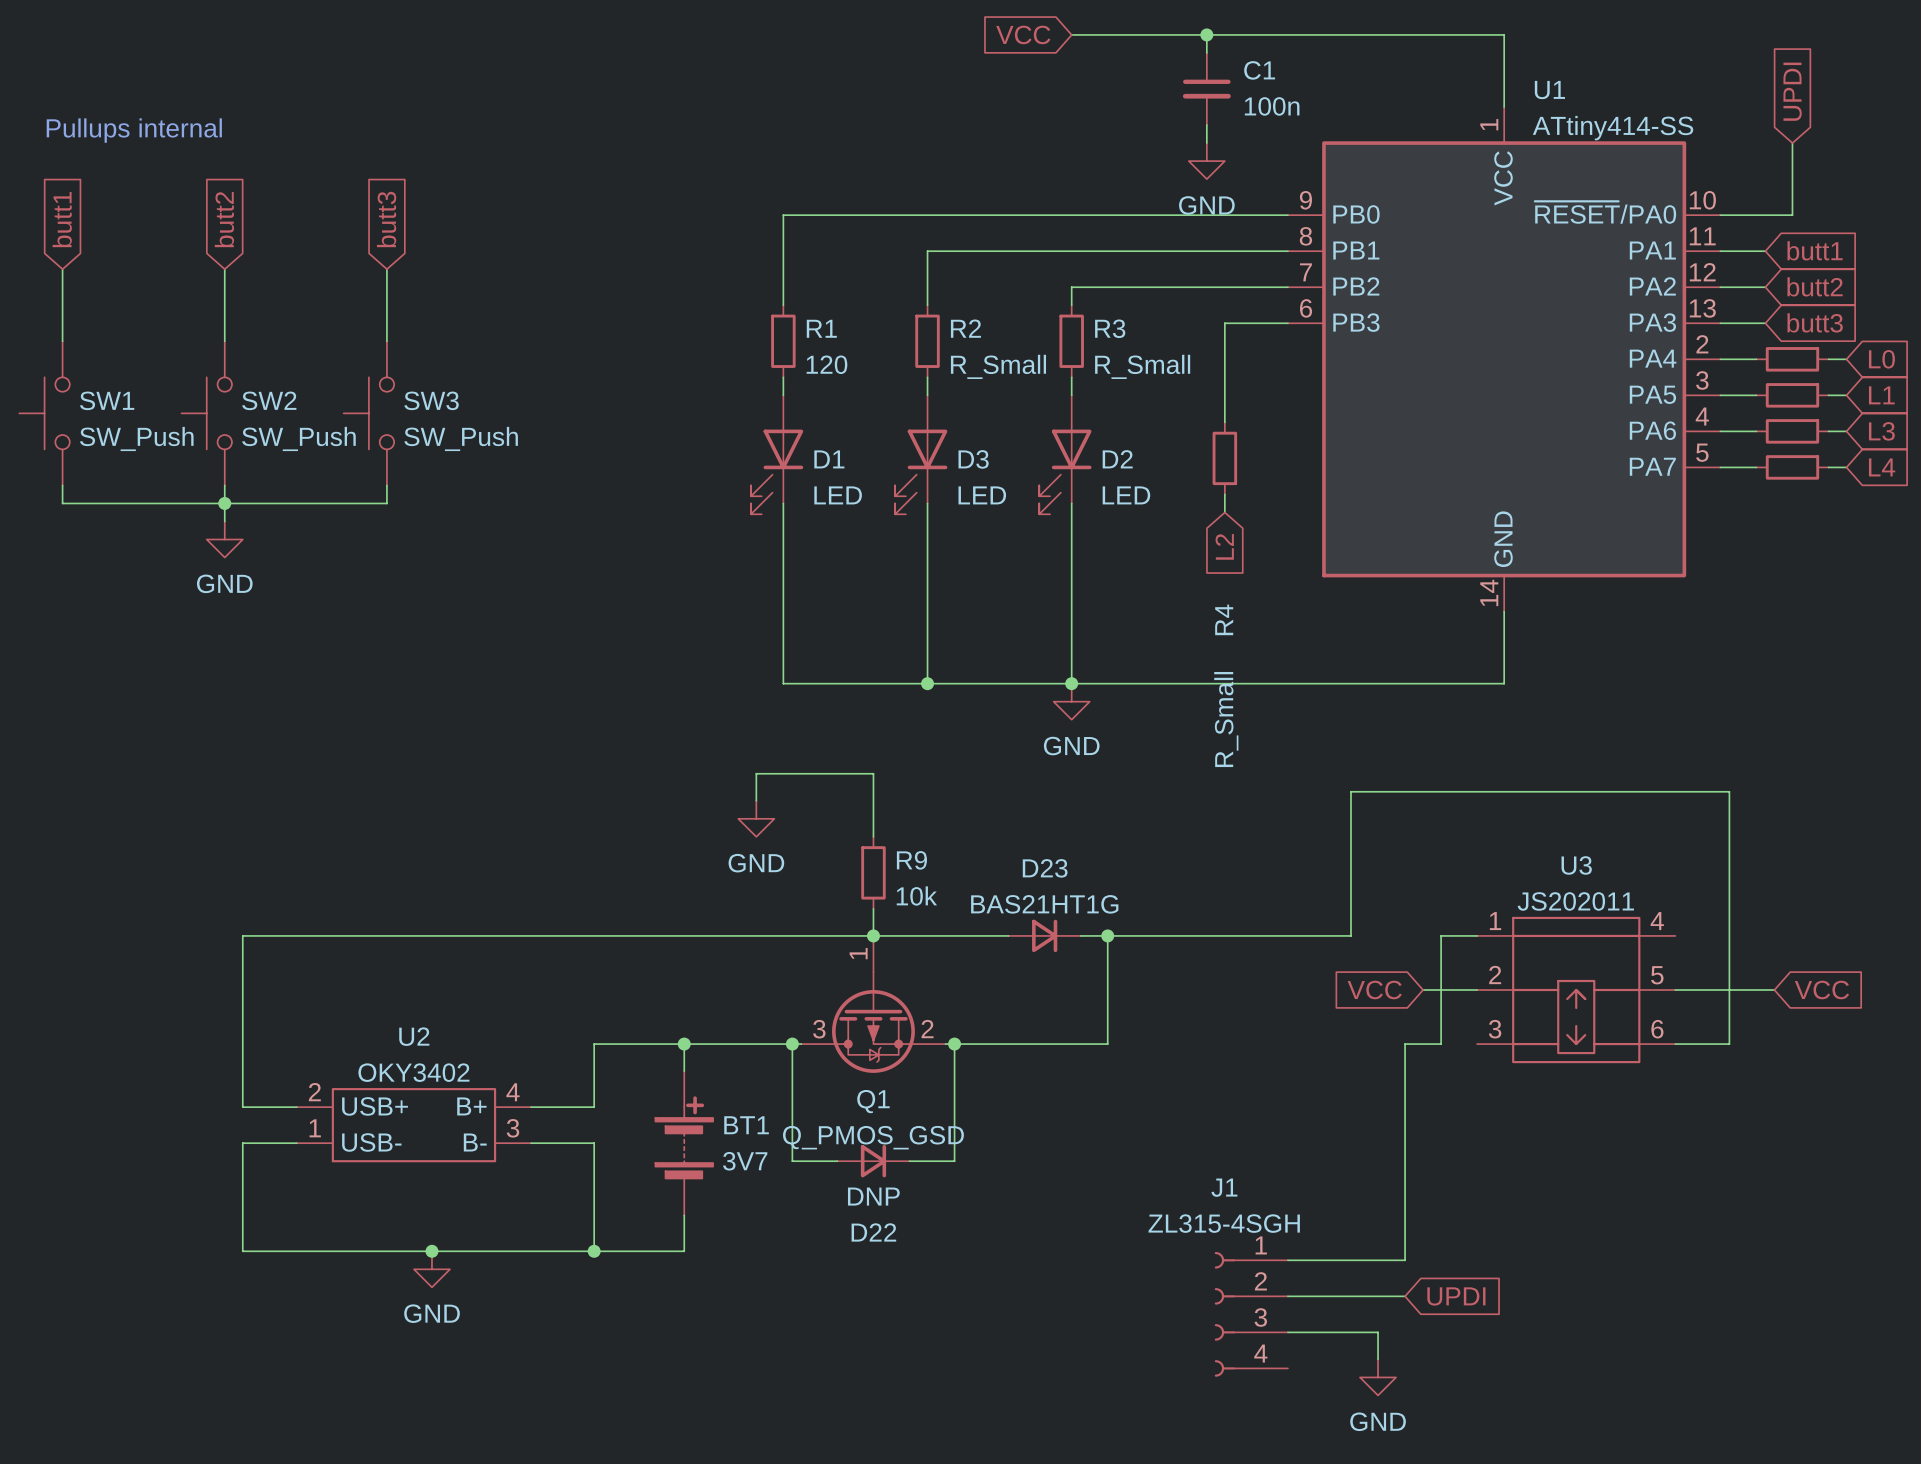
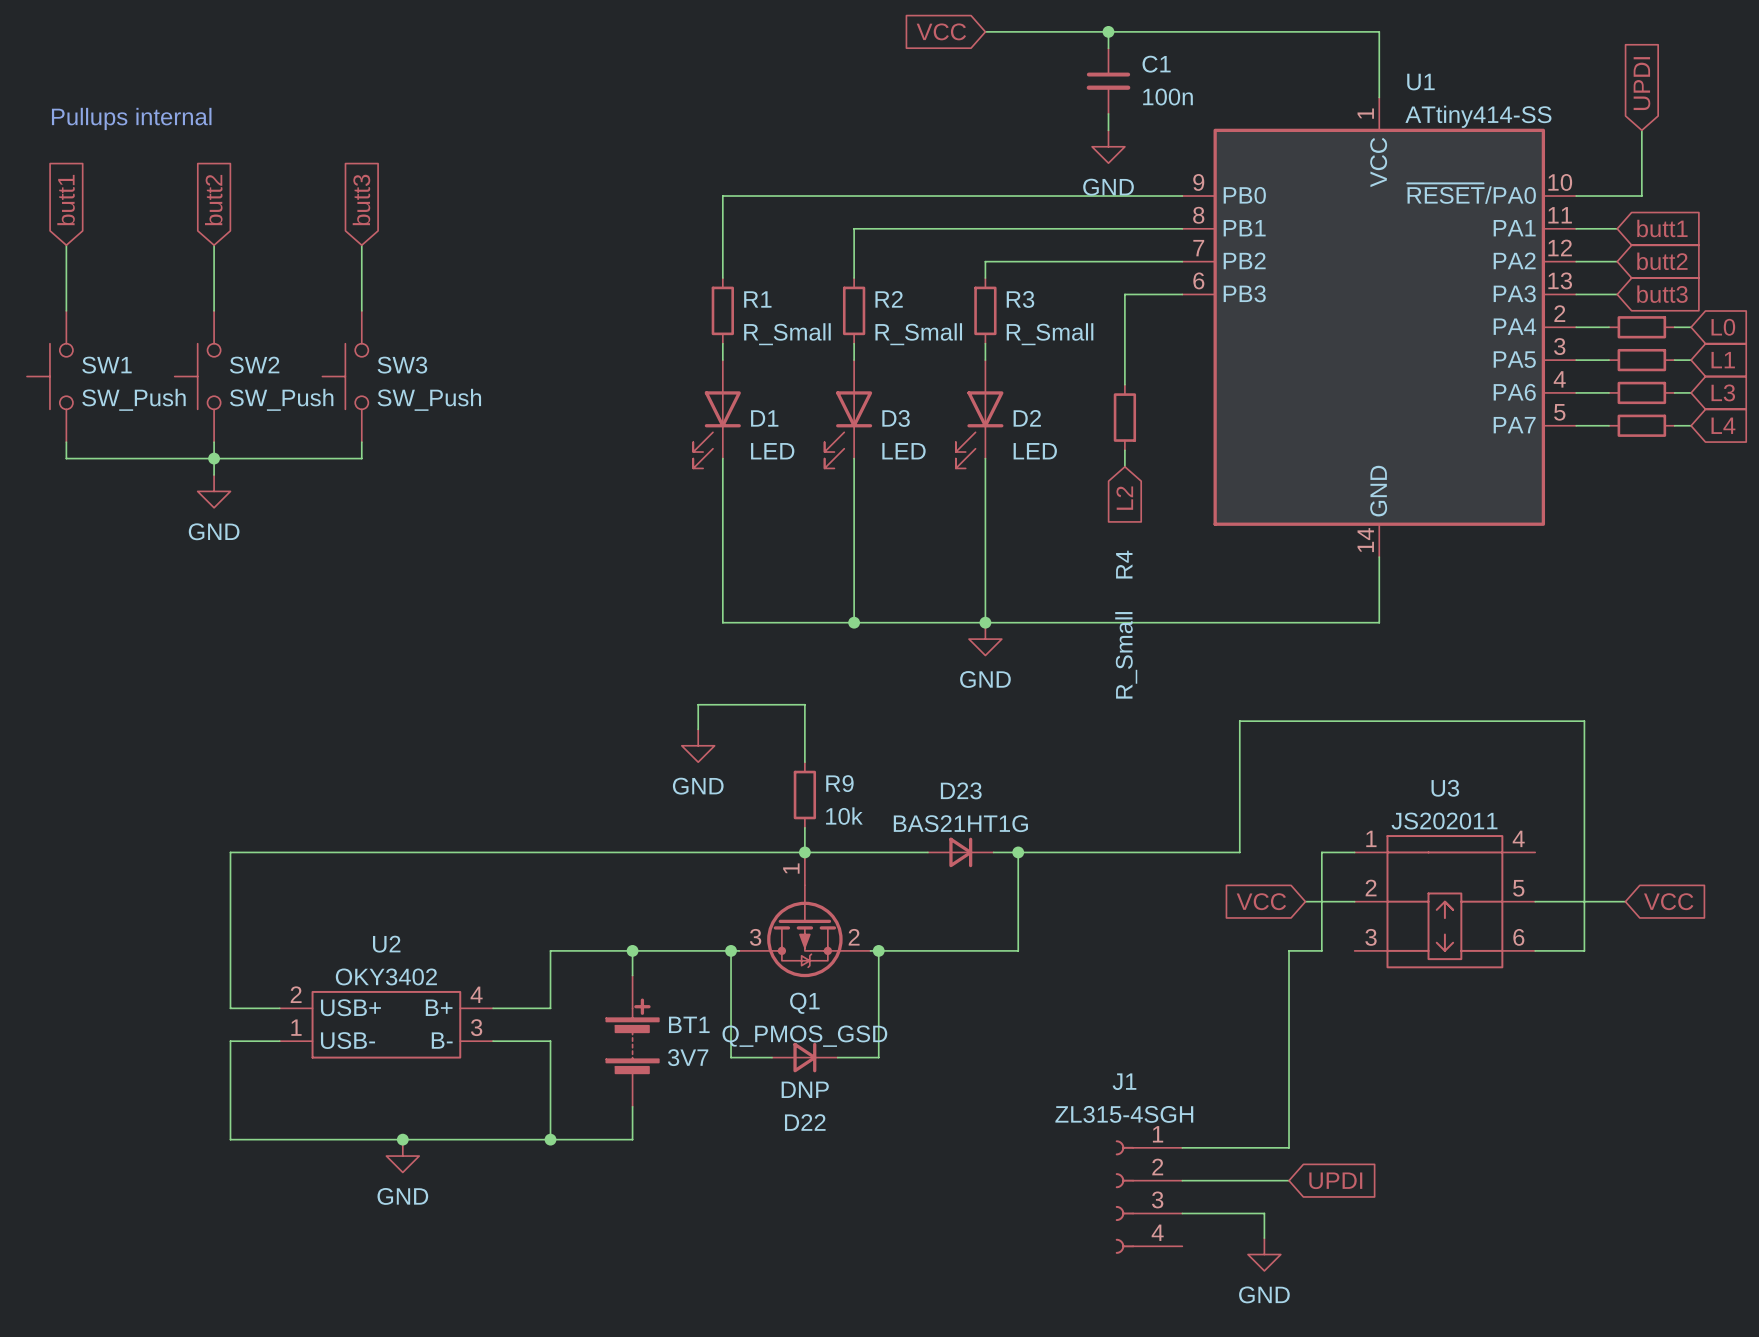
R1 value: 120 (826, 364) -> R_Small (787, 334)

